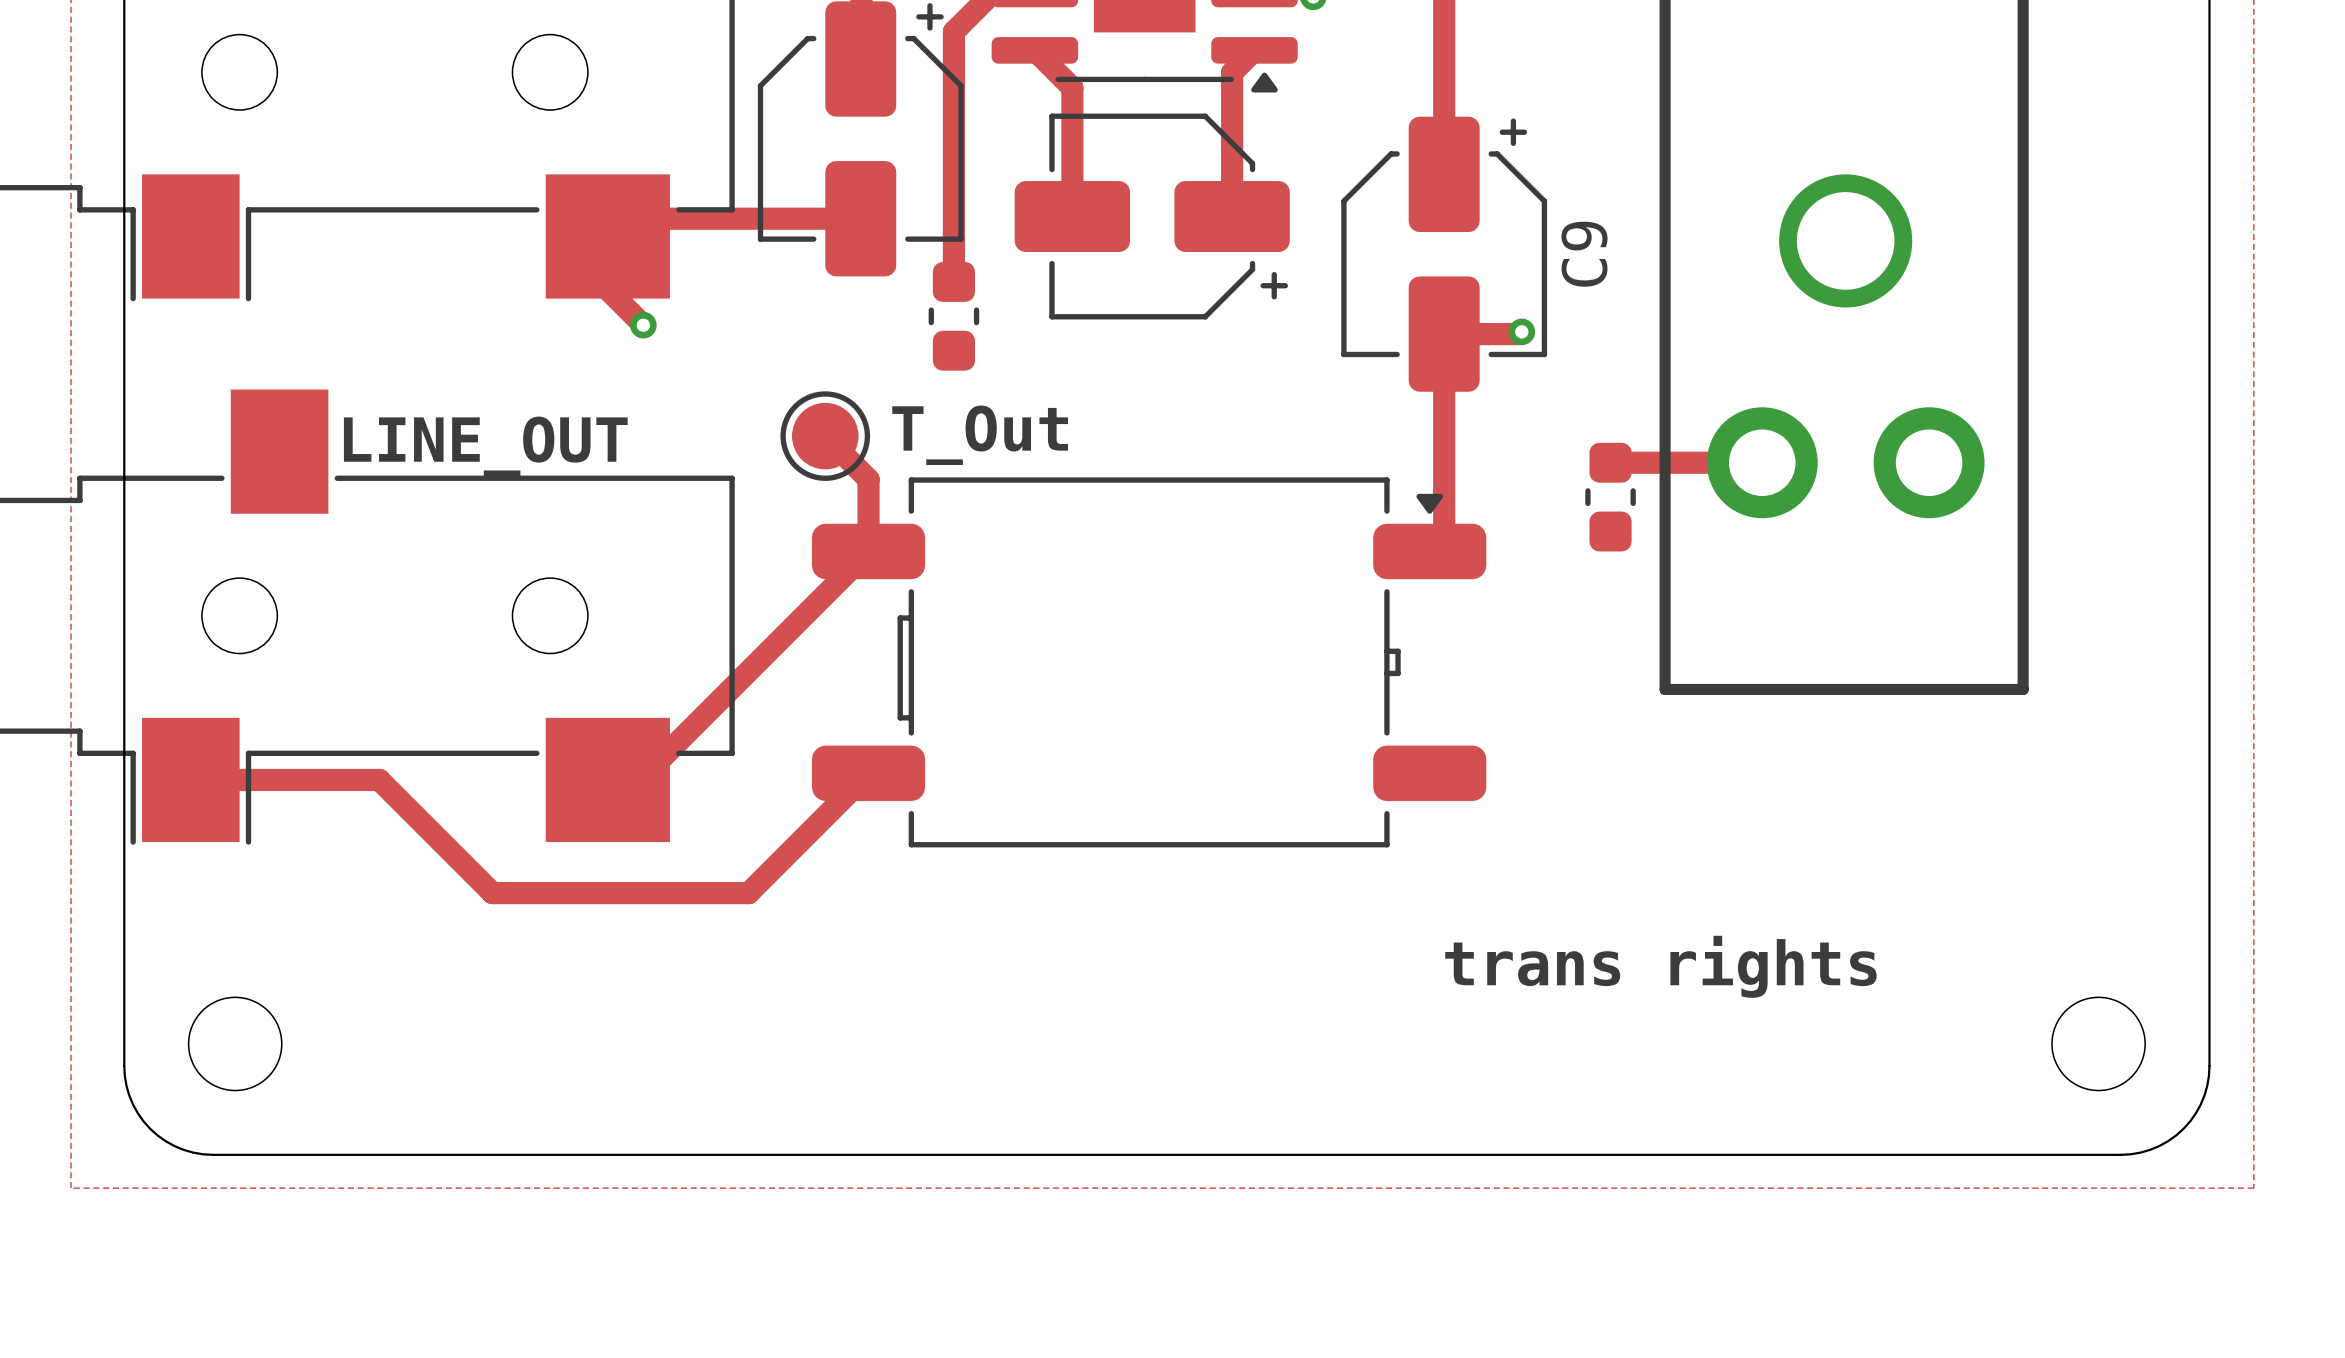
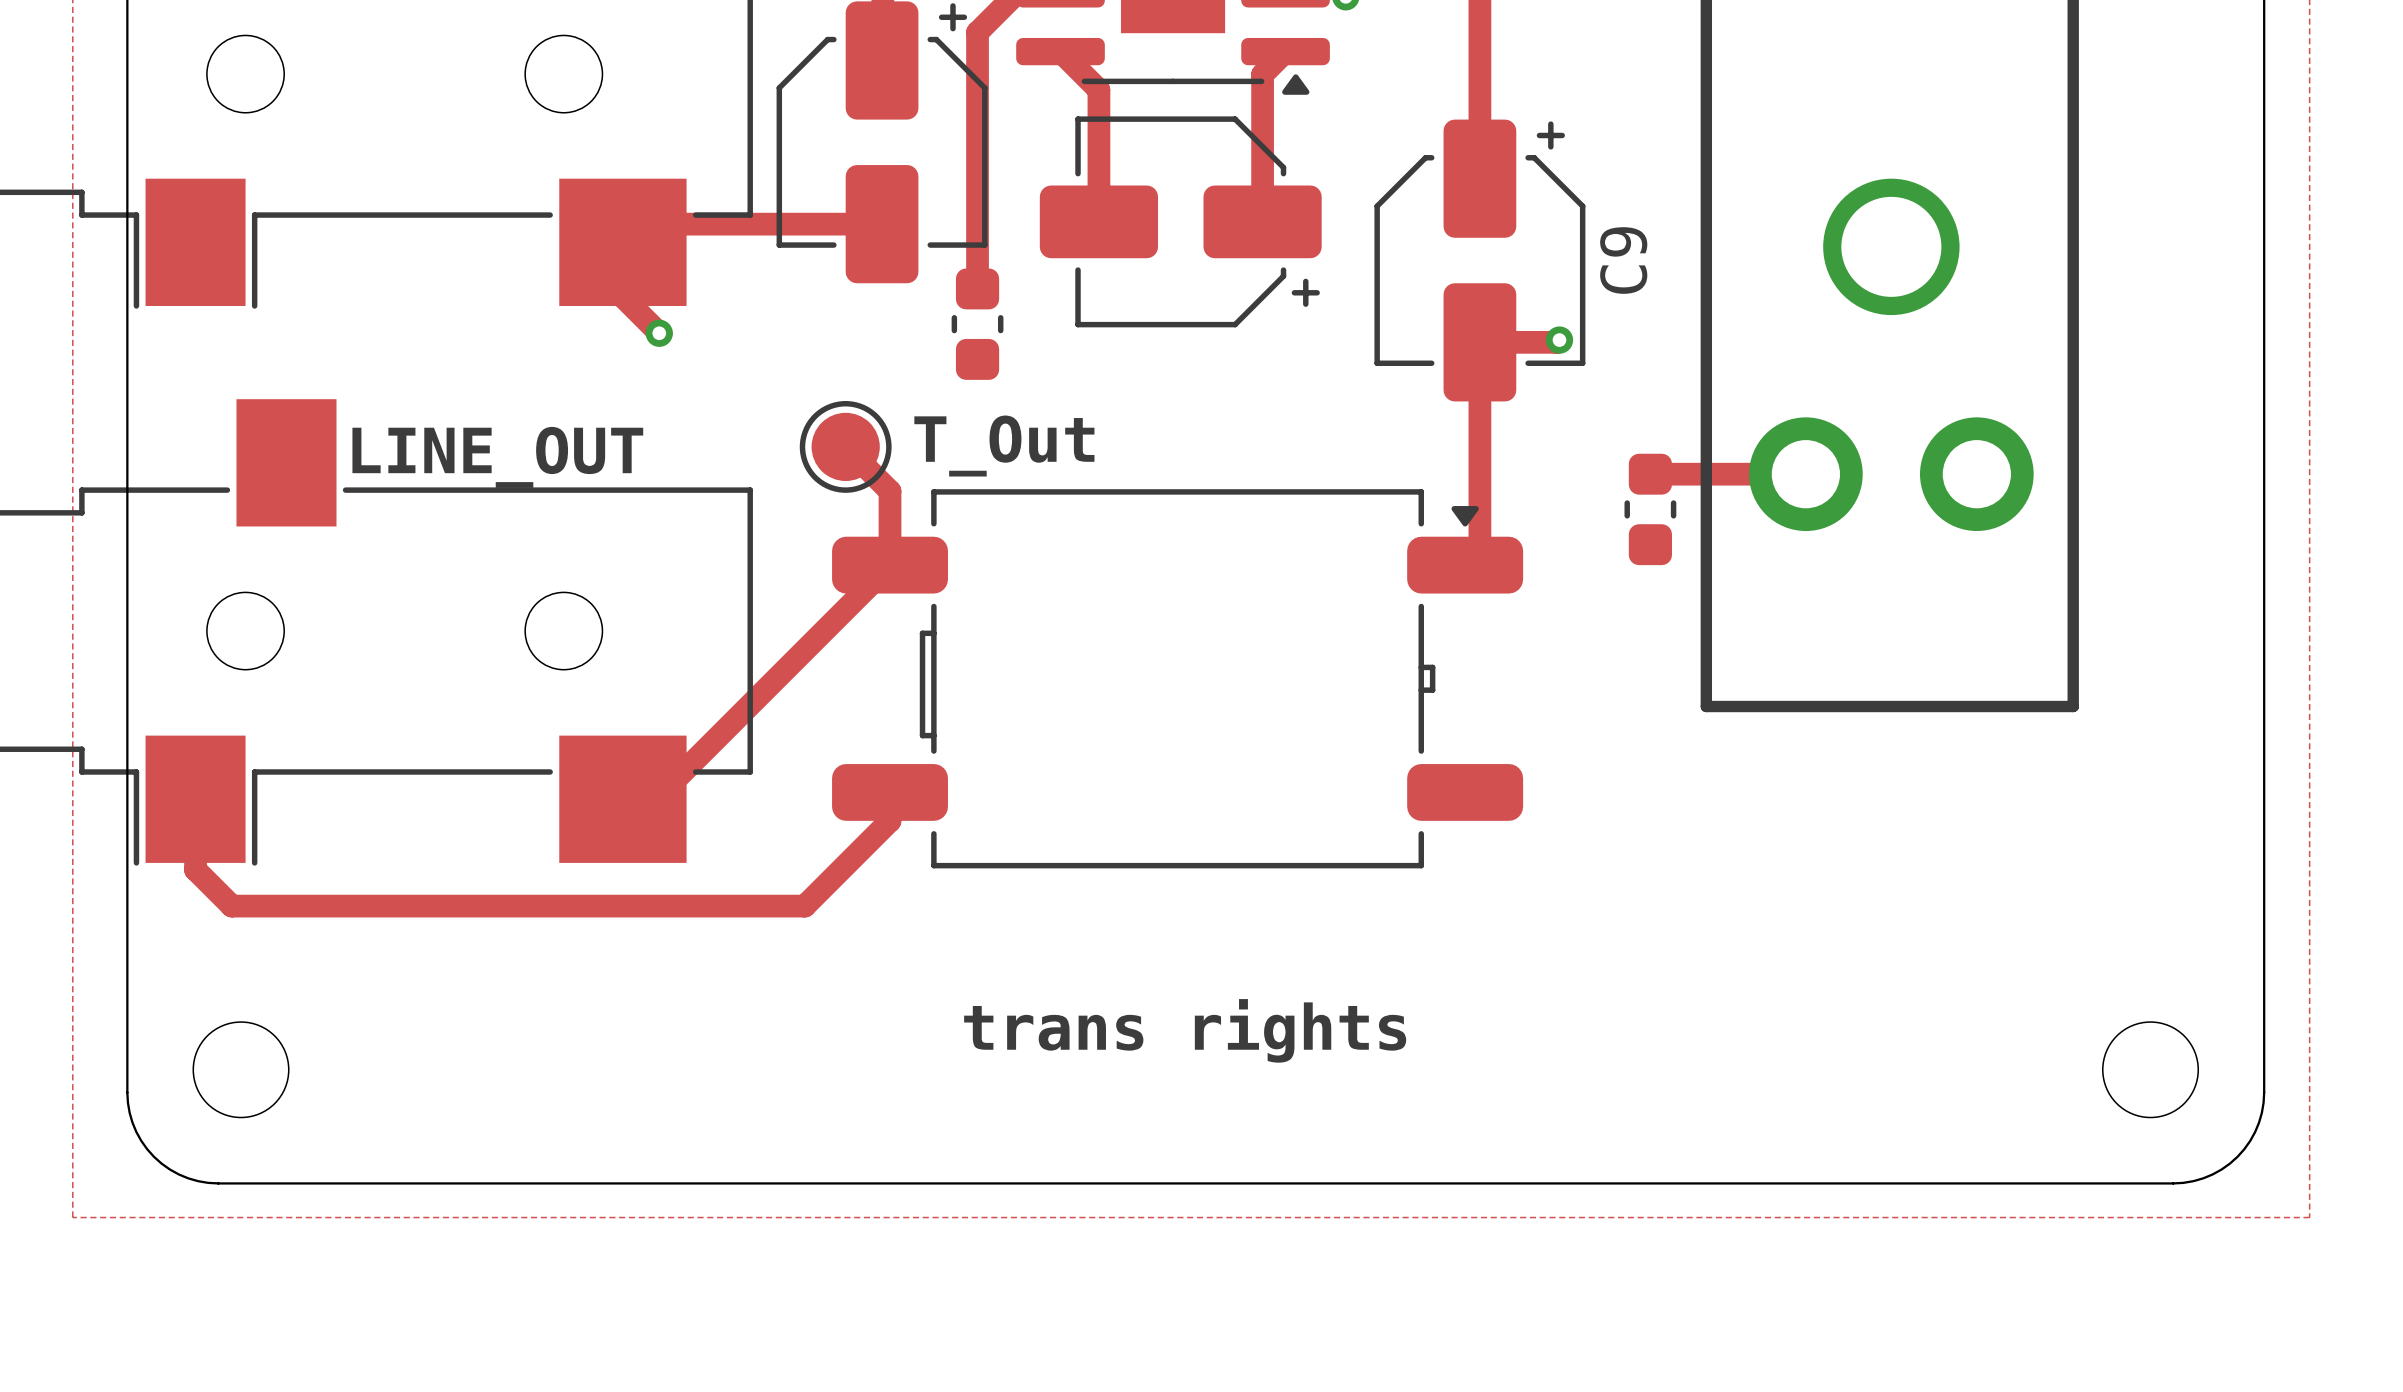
track: (868, 773) (748, 893) (492, 893) (379, 779) (190, 779) -> (890, 792) (890, 820) (804, 906) (231, 906) (195, 869) (195, 799)
text position: trans rights (1660, 966) -> trans rights (1185, 1030)

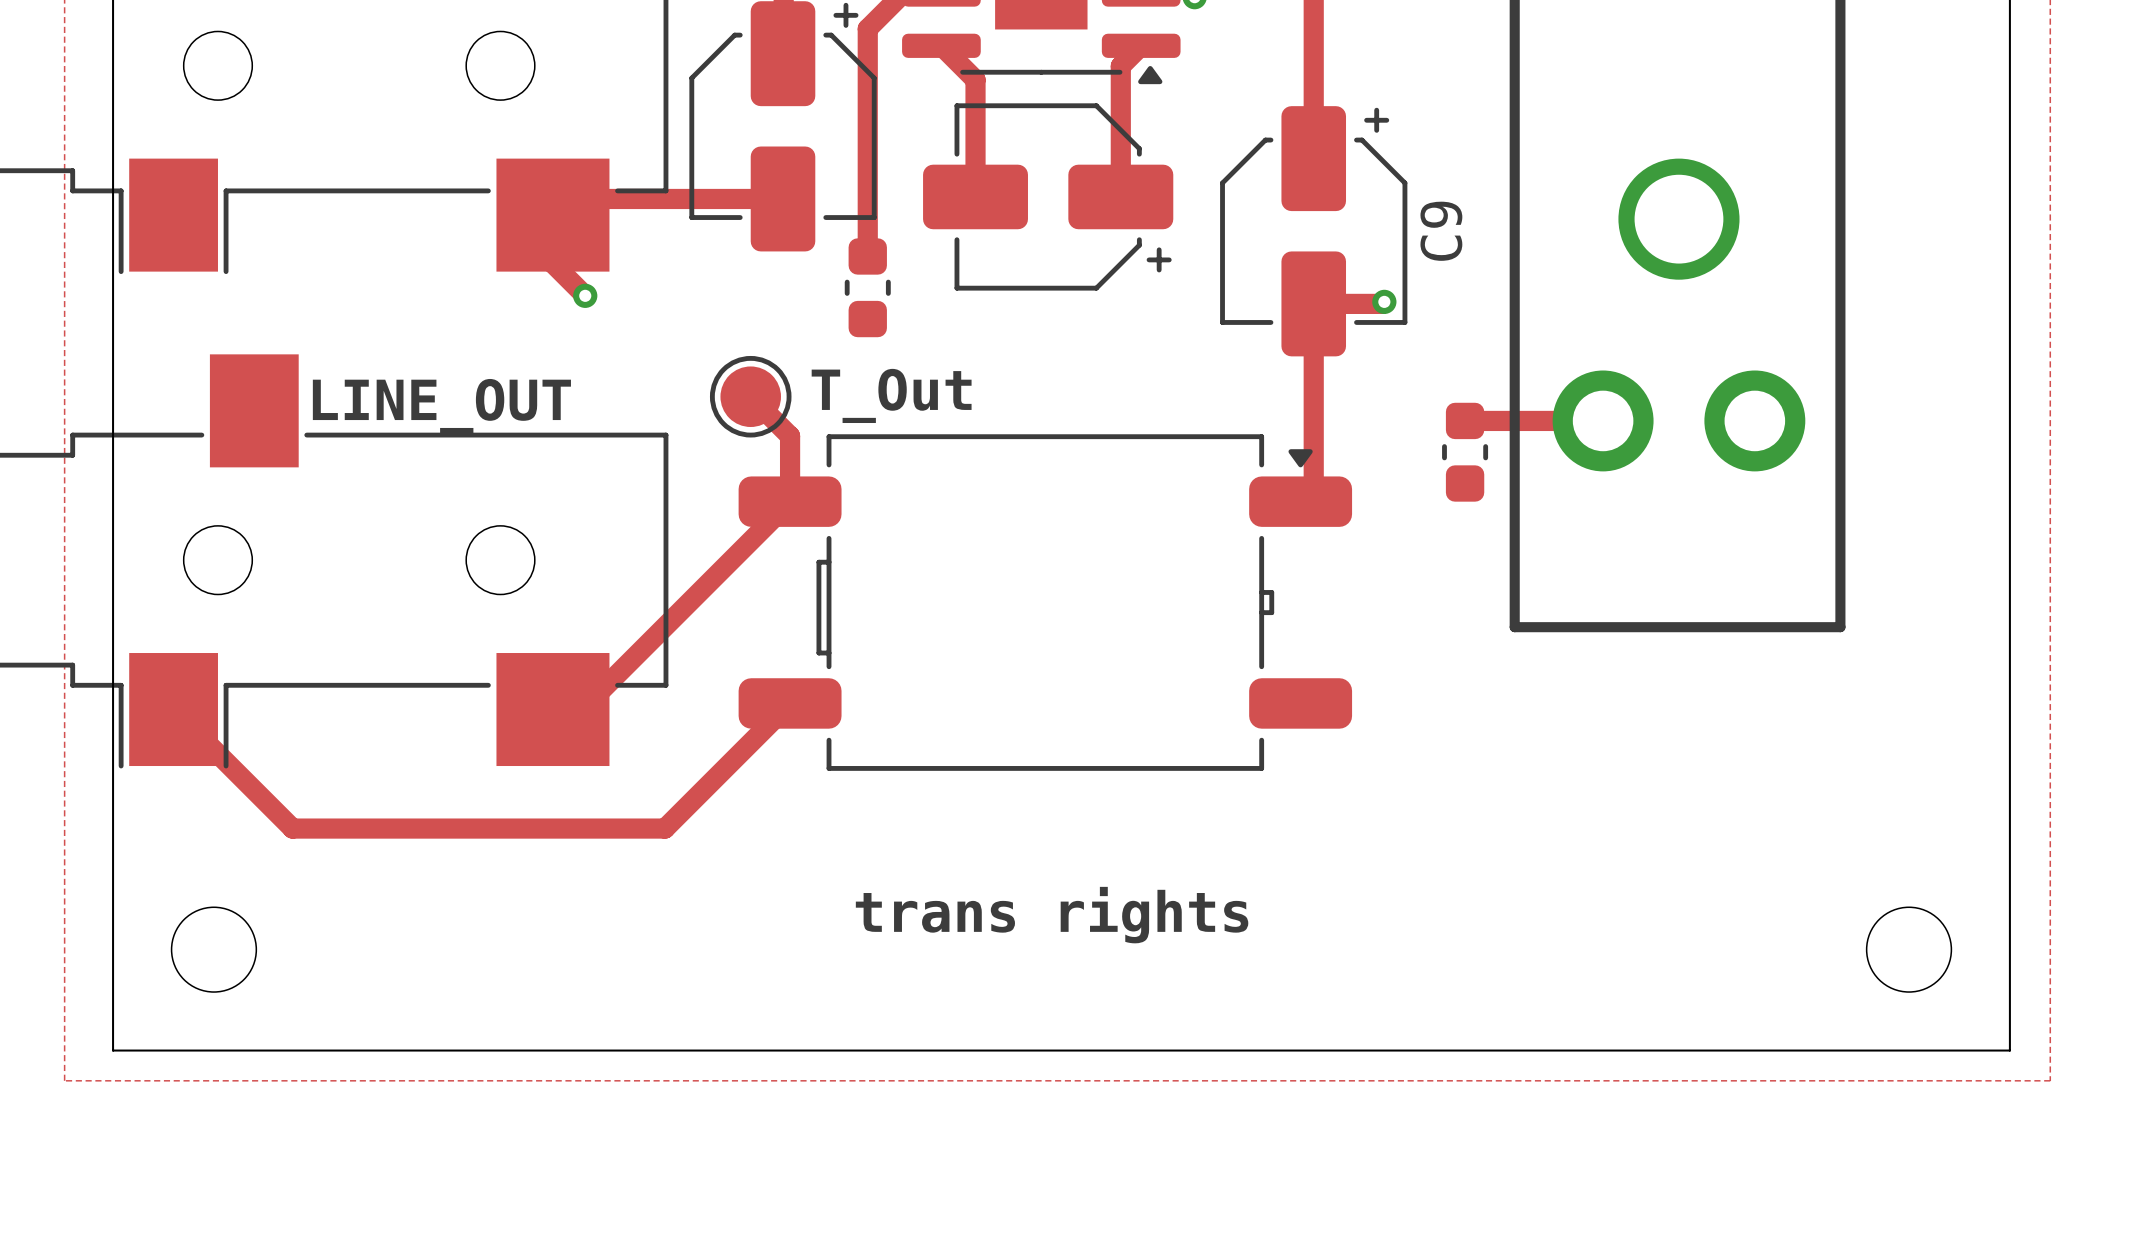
track: (890, 792) (890, 820) (804, 906) (231, 906) (195, 869) (195, 799) -> (790, 703) (664, 828) (292, 828) (173, 709)
board edge: (127, 1092) (132, 1122) (141, 1140) (153, 1156) (178, 1174) (198, 1181) (218, 1183) -> (113, 969) (113, 1050) (193, 1050)
board edge: (2264, 1092) (2259, 1122) (2250, 1140) (2237, 1156) (2212, 1174) (2193, 1181) (2173, 1183) -> (2009, 969) (2009, 1050) (1929, 1050)

